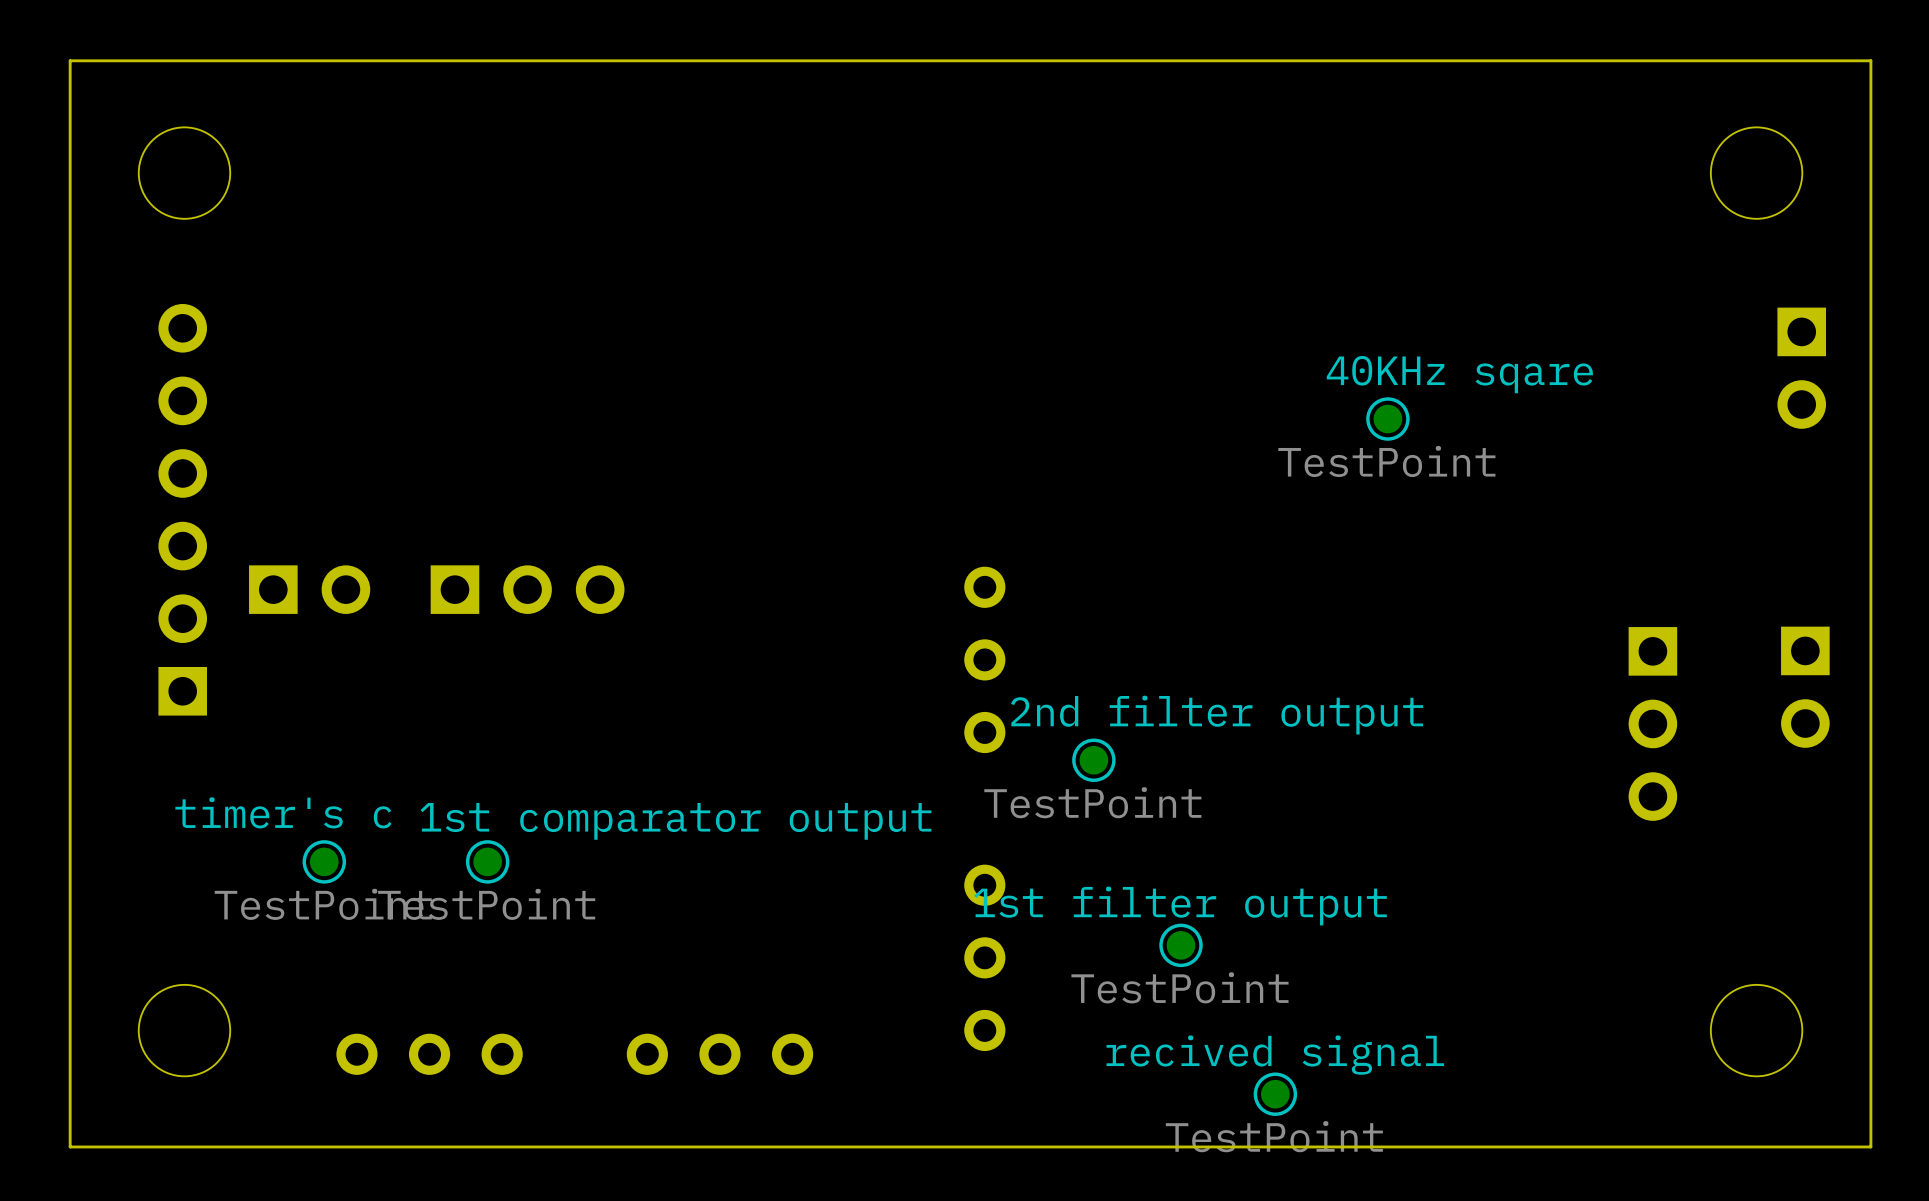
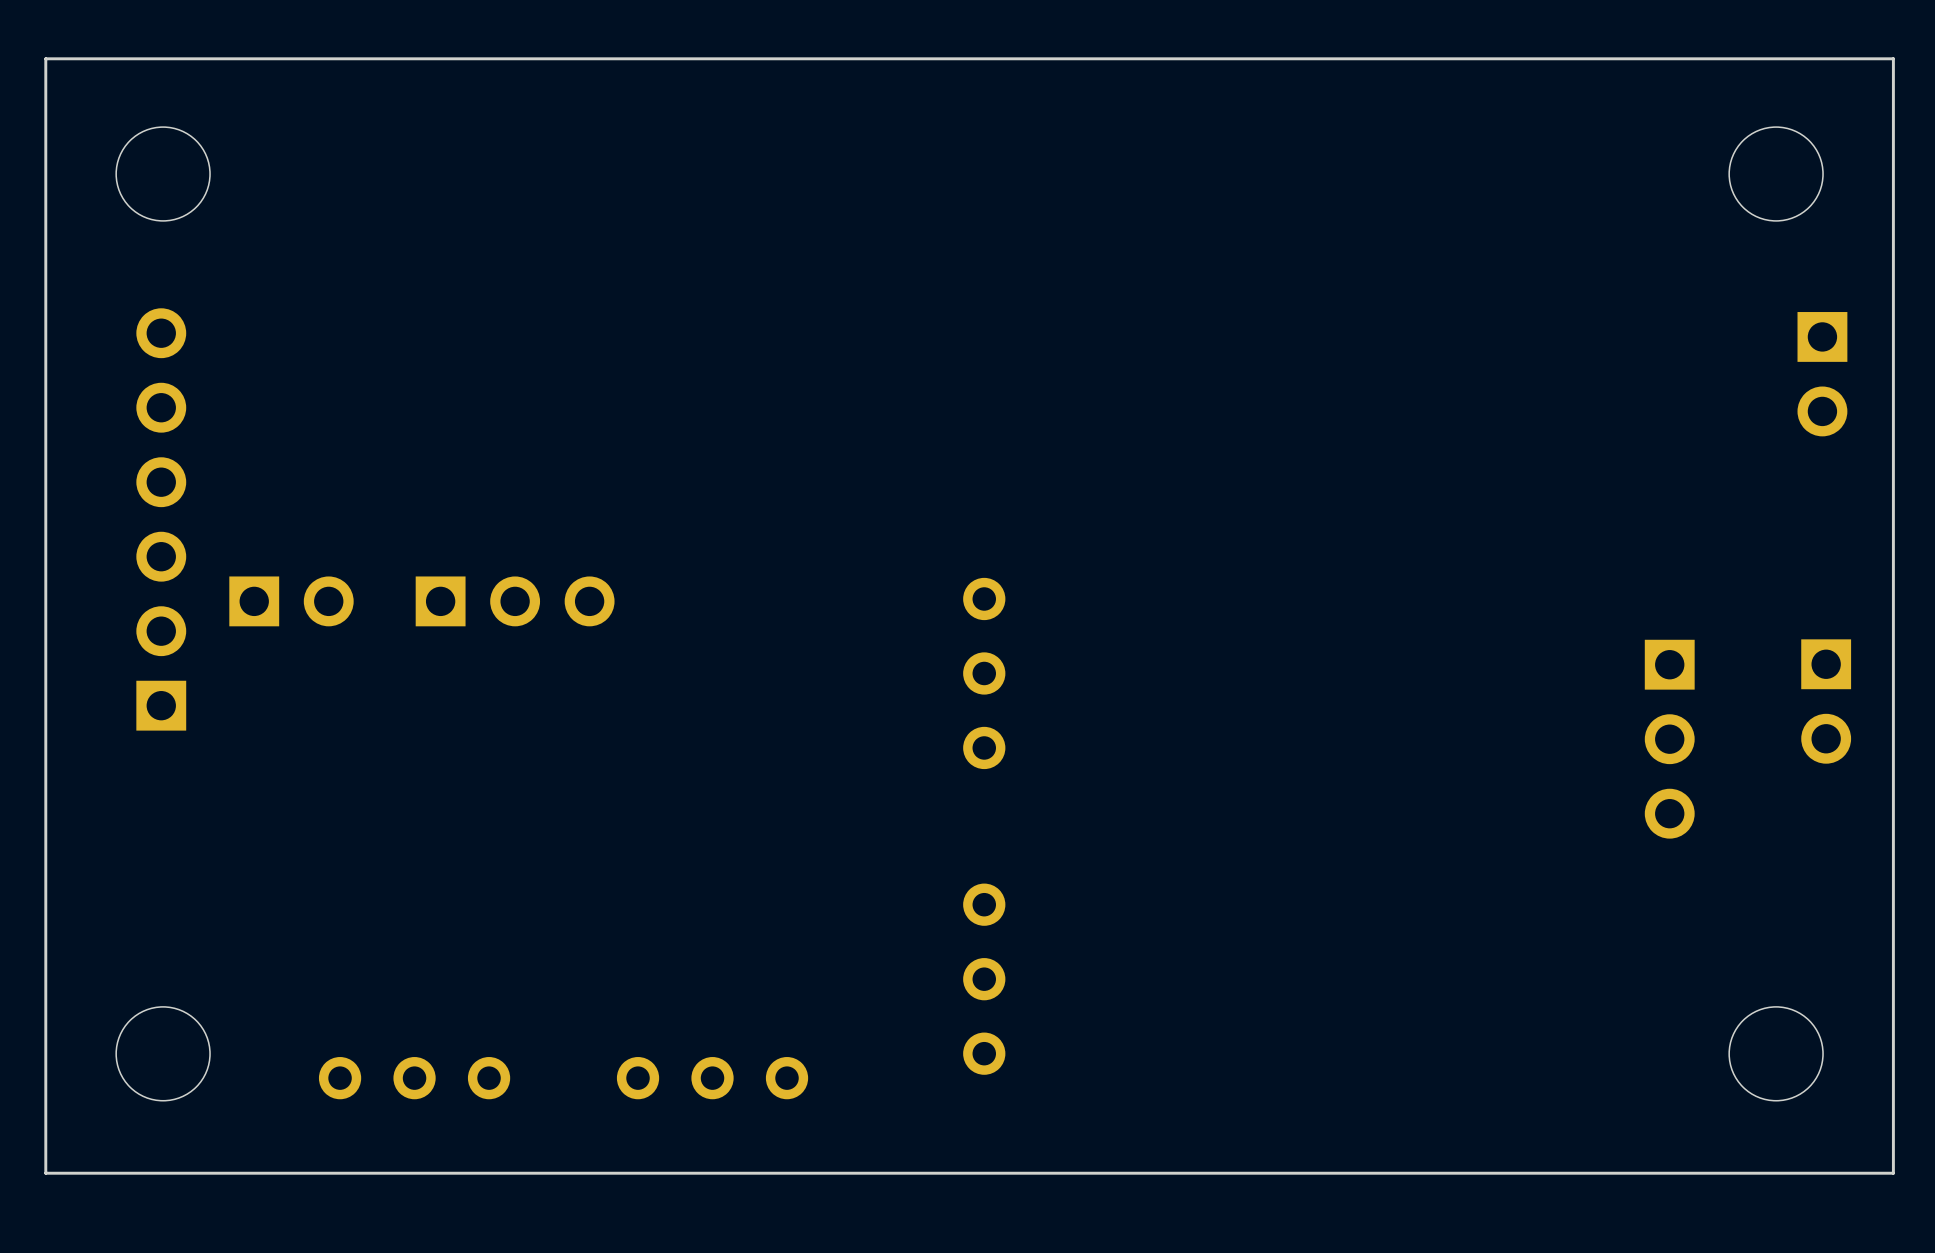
40KHz sqare: TestPoint (1387, 419) -> none
2nd filter output: TestPoint (1093, 760) -> none
timer's c: TestPoint (324, 861) -> none
1st comparator output: TestPoint (487, 861) -> none
1st filter output: TestPoint (1180, 945) -> none
recived signal: TestPoint (1275, 1094) -> none

